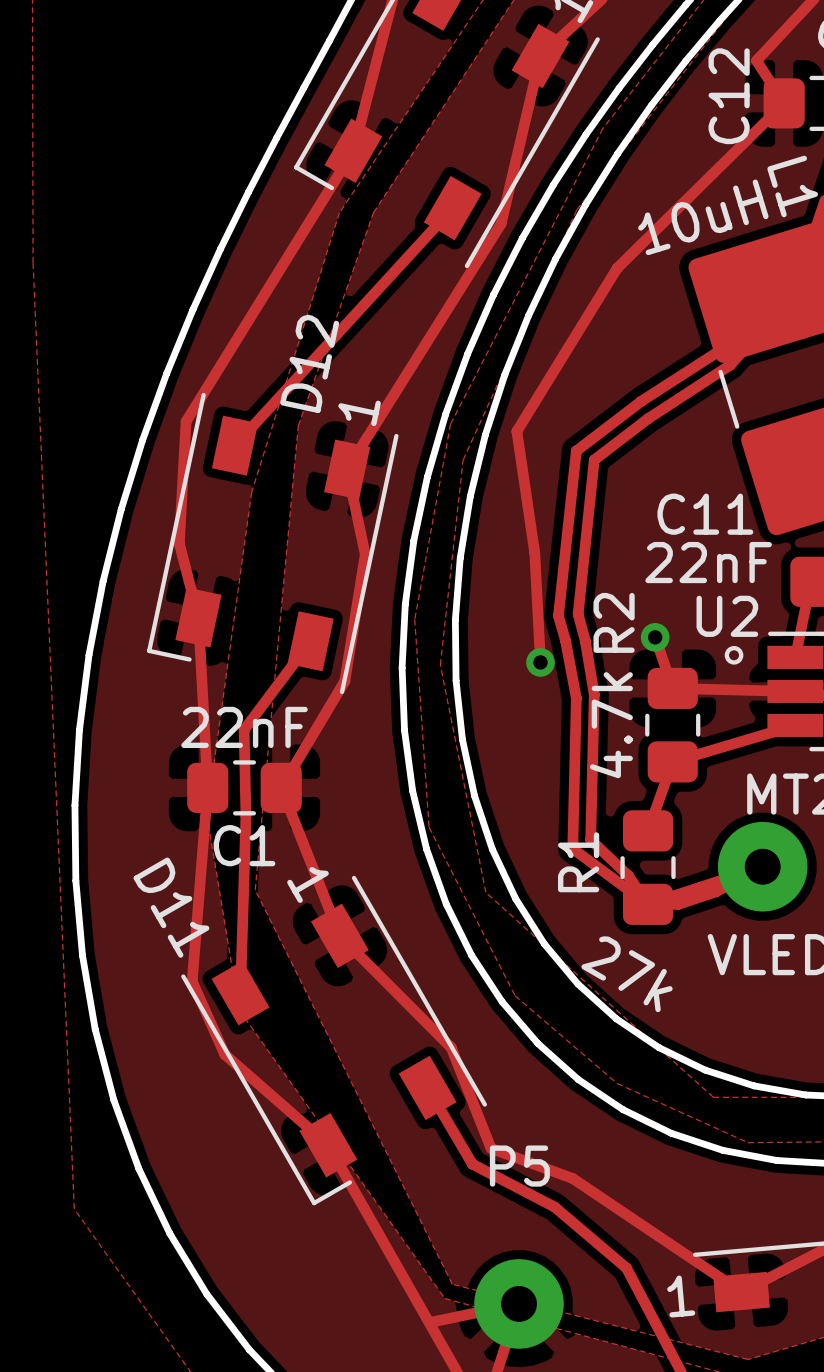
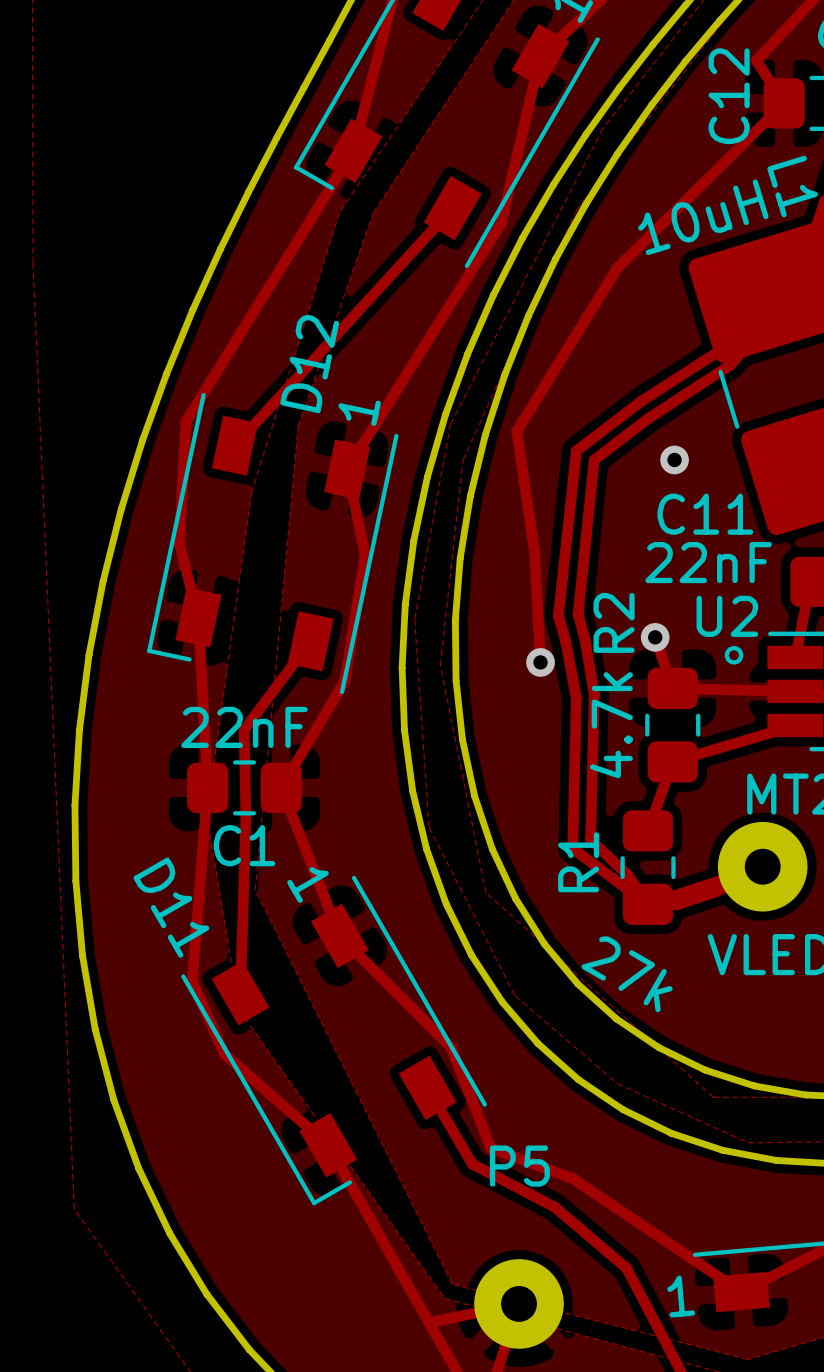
via: none -> (674, 459)

